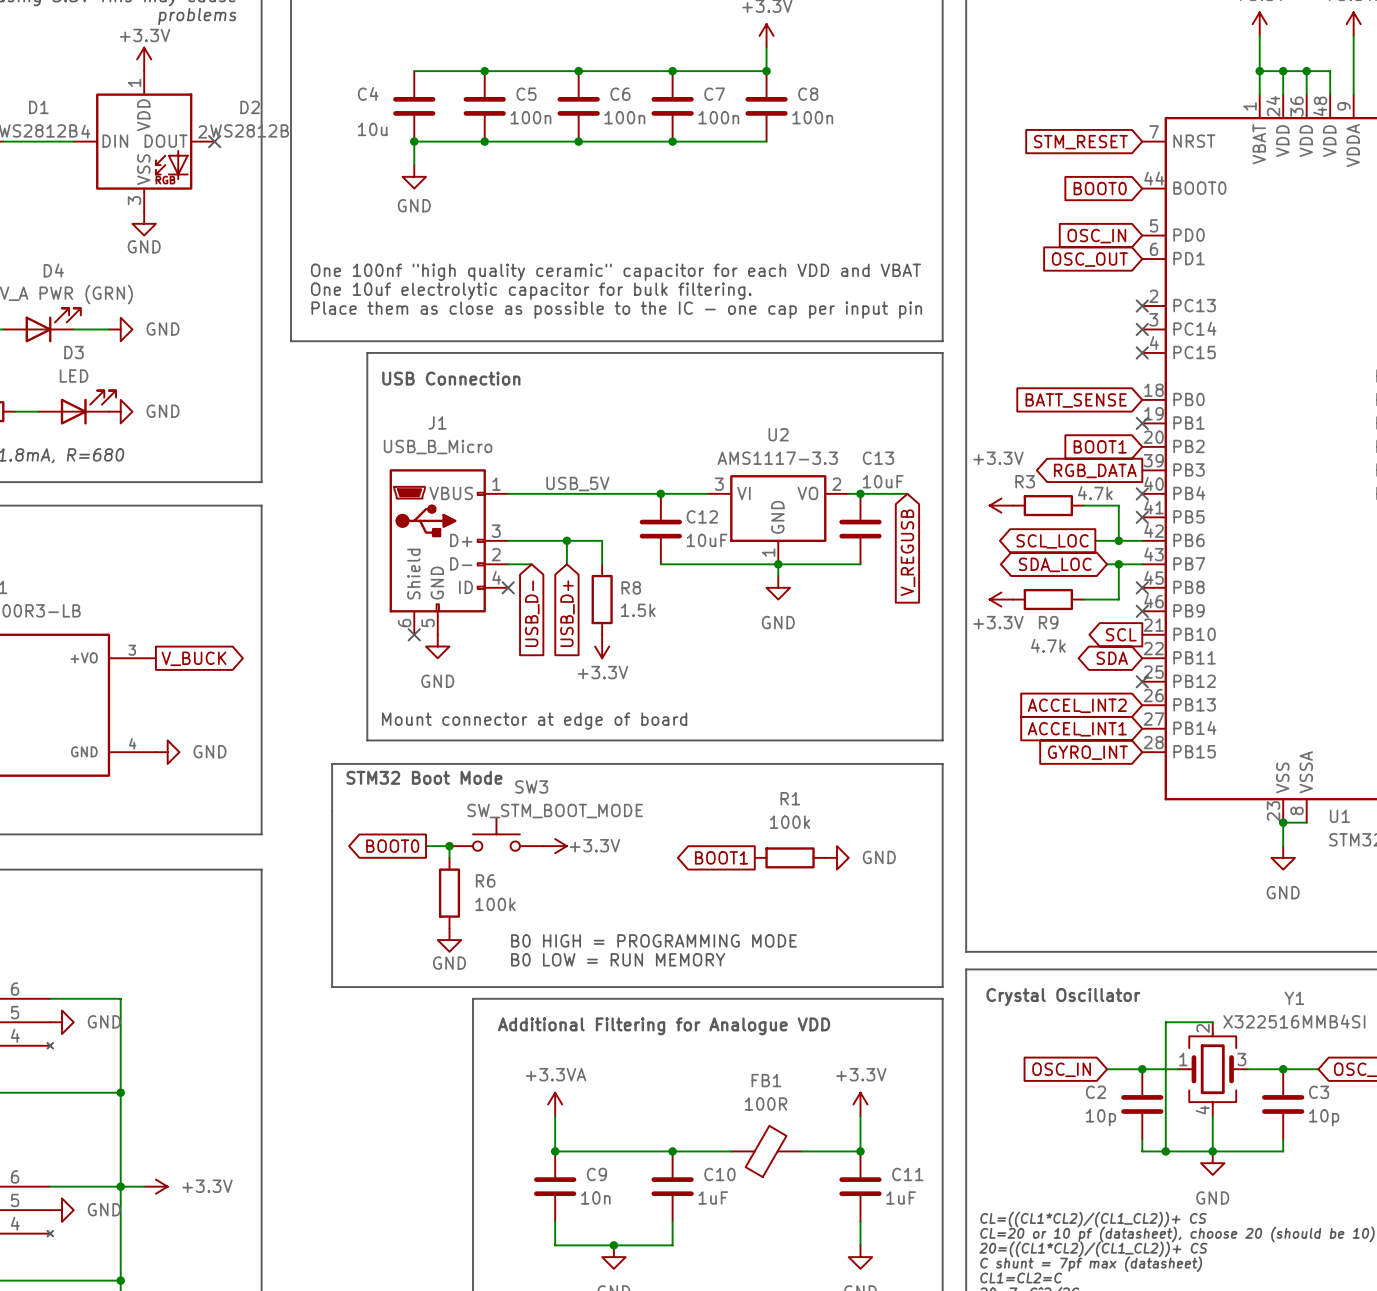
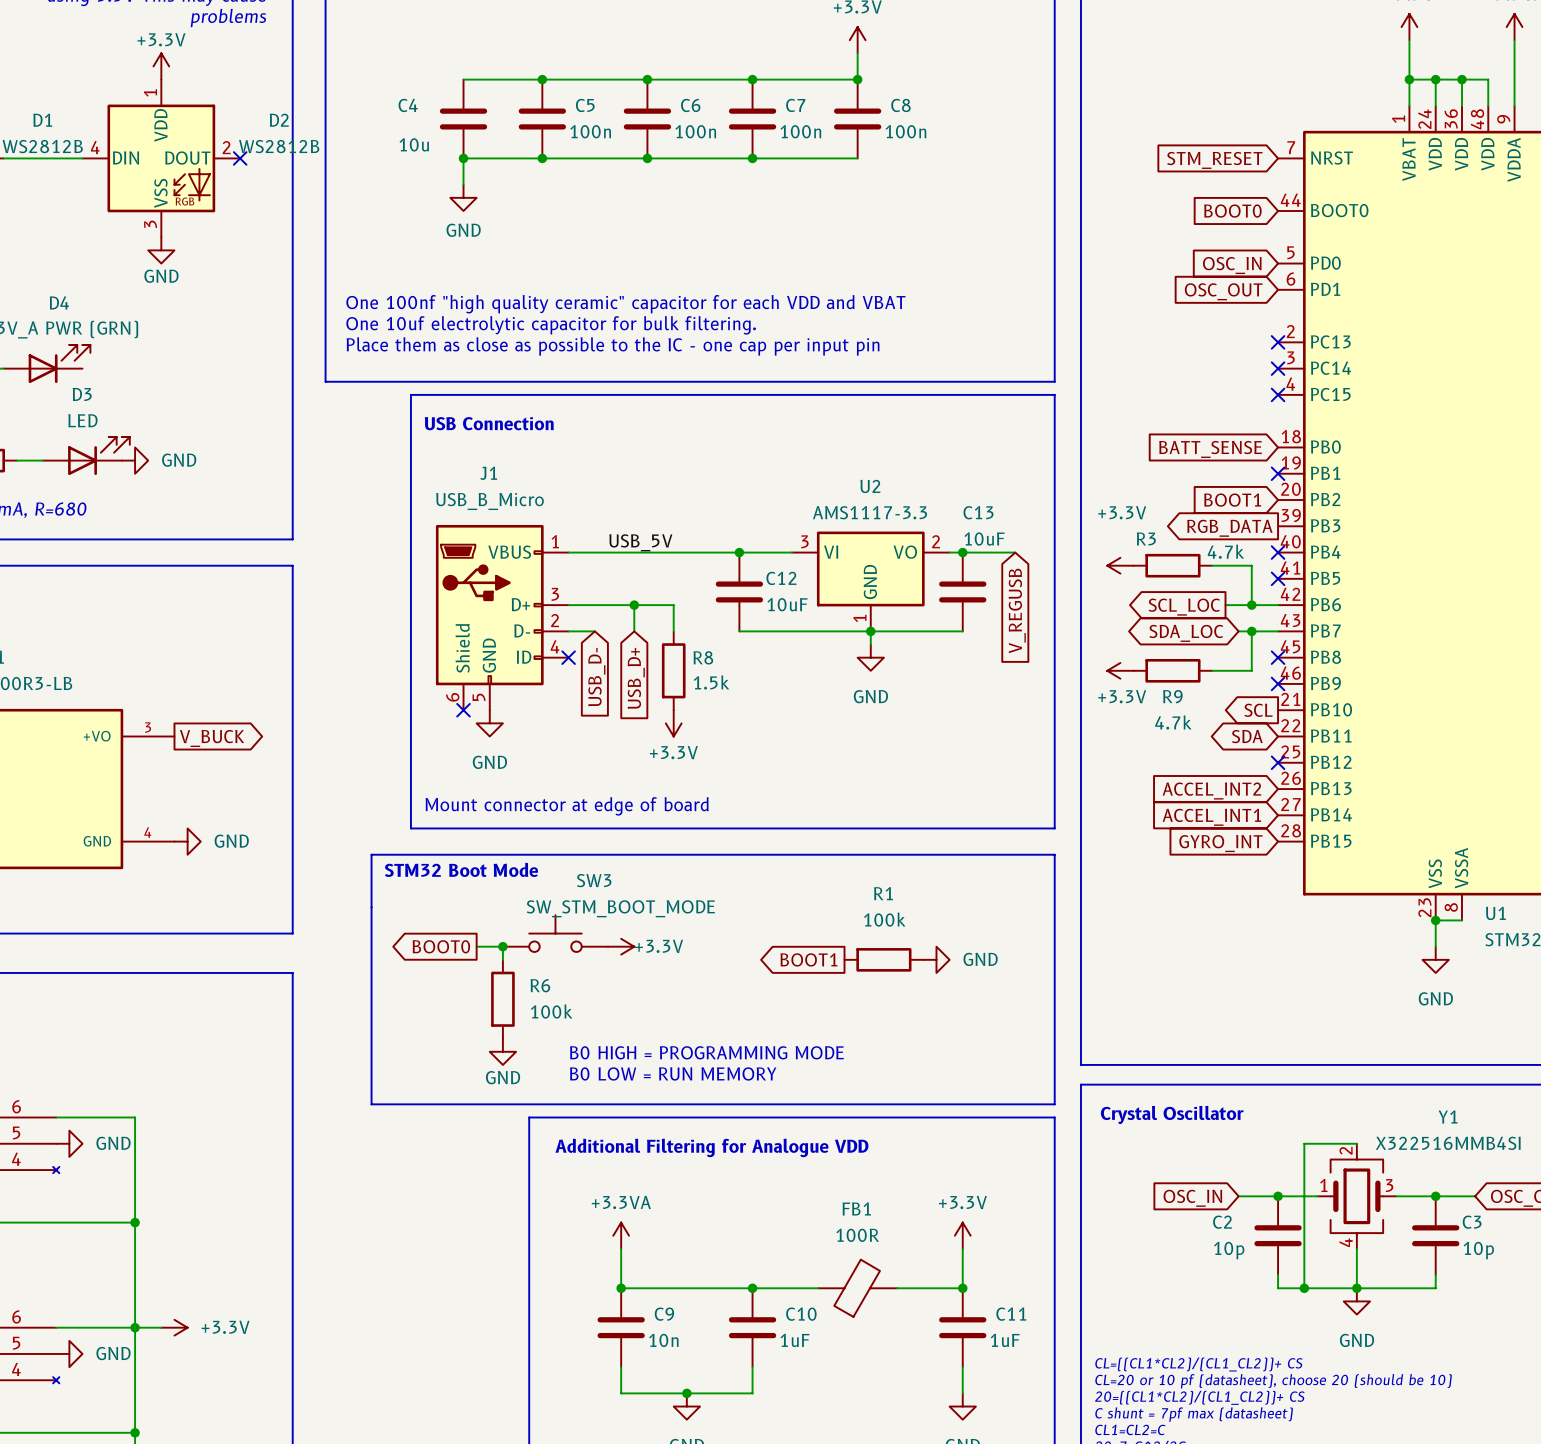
wire: (73, 329) (108, 329) -> none
power symbol: GND (120, 329) -> none

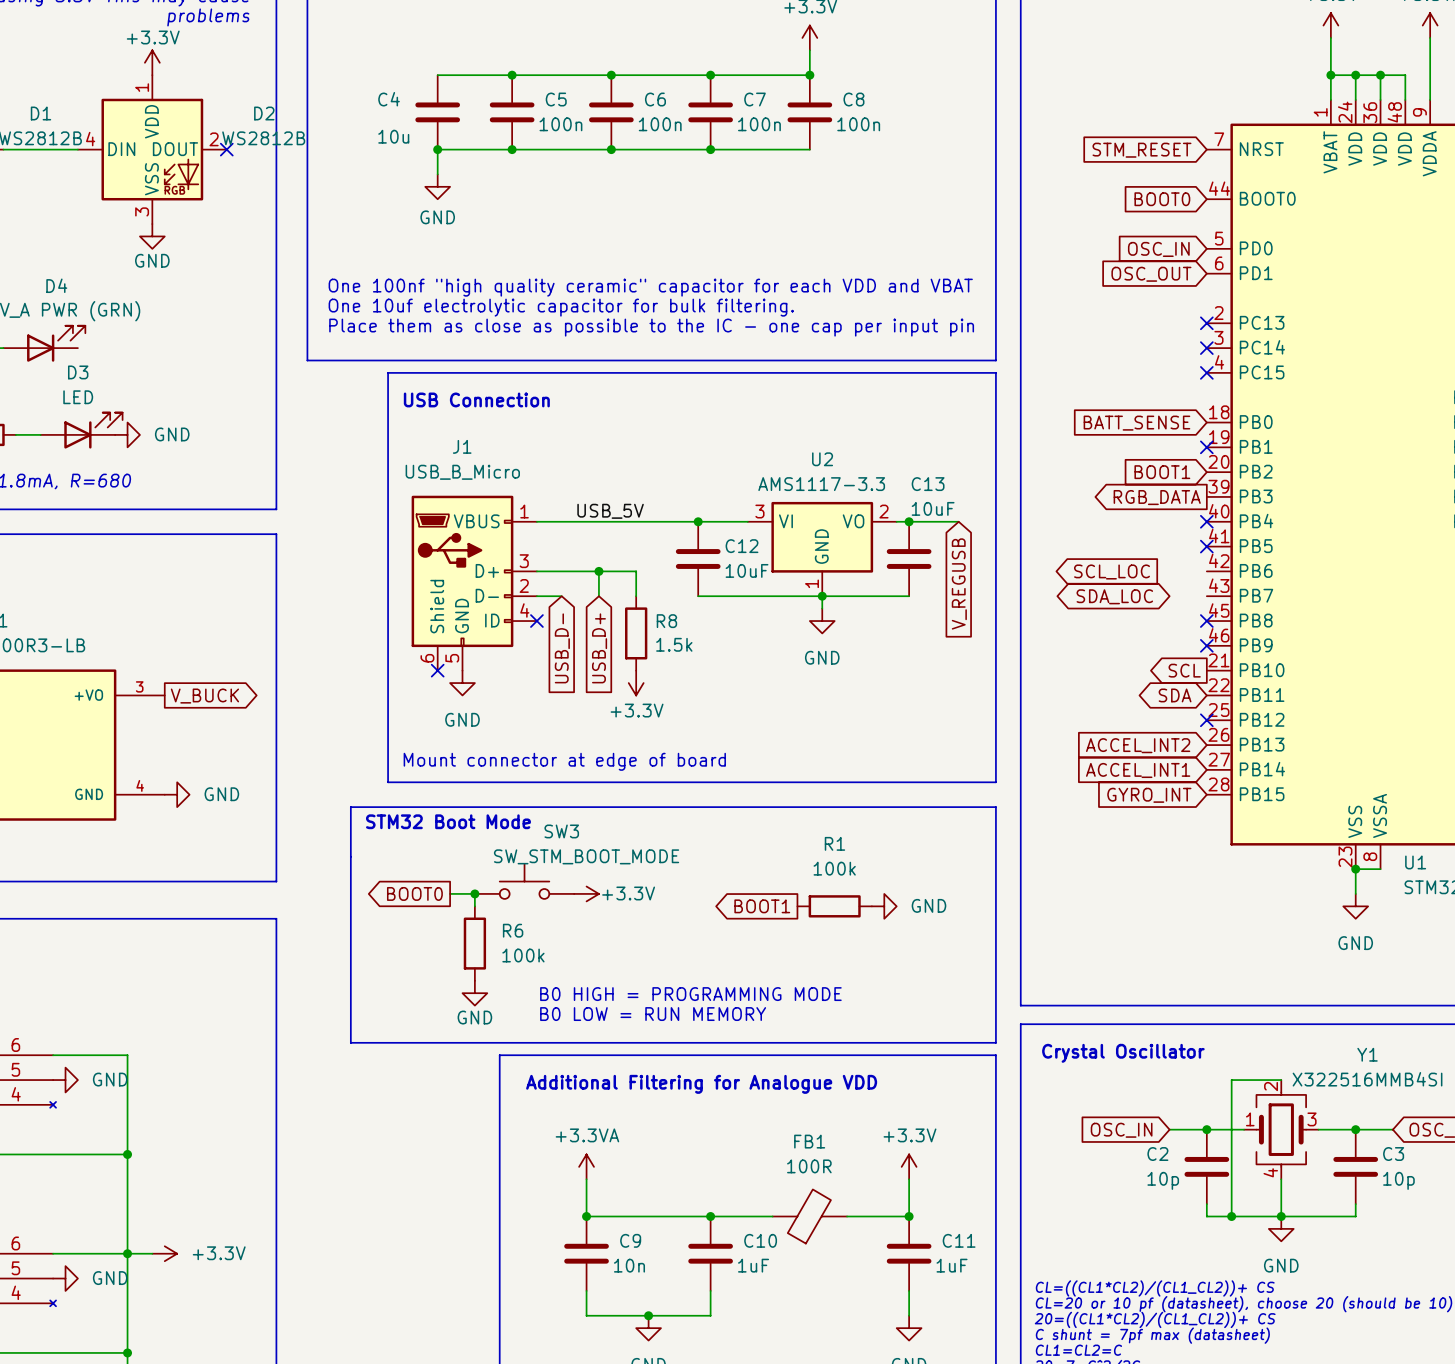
power symbol: +3.3V (1120, 565) -> none
R3: 4.7k (1172, 565) -> none
wire: (1212, 565) (1251, 565) (1251, 605) -> none
wire: (1225, 605) (1278, 605) -> none
junction: (1251, 605) -> none
wire: (1238, 631) (1278, 631) -> none
wire: (1251, 631) (1251, 670) (1212, 670) -> none
junction: (1251, 631) -> none
power symbol: +3.3V (1120, 670) -> none
R9: 4.7k (1172, 670) -> none

